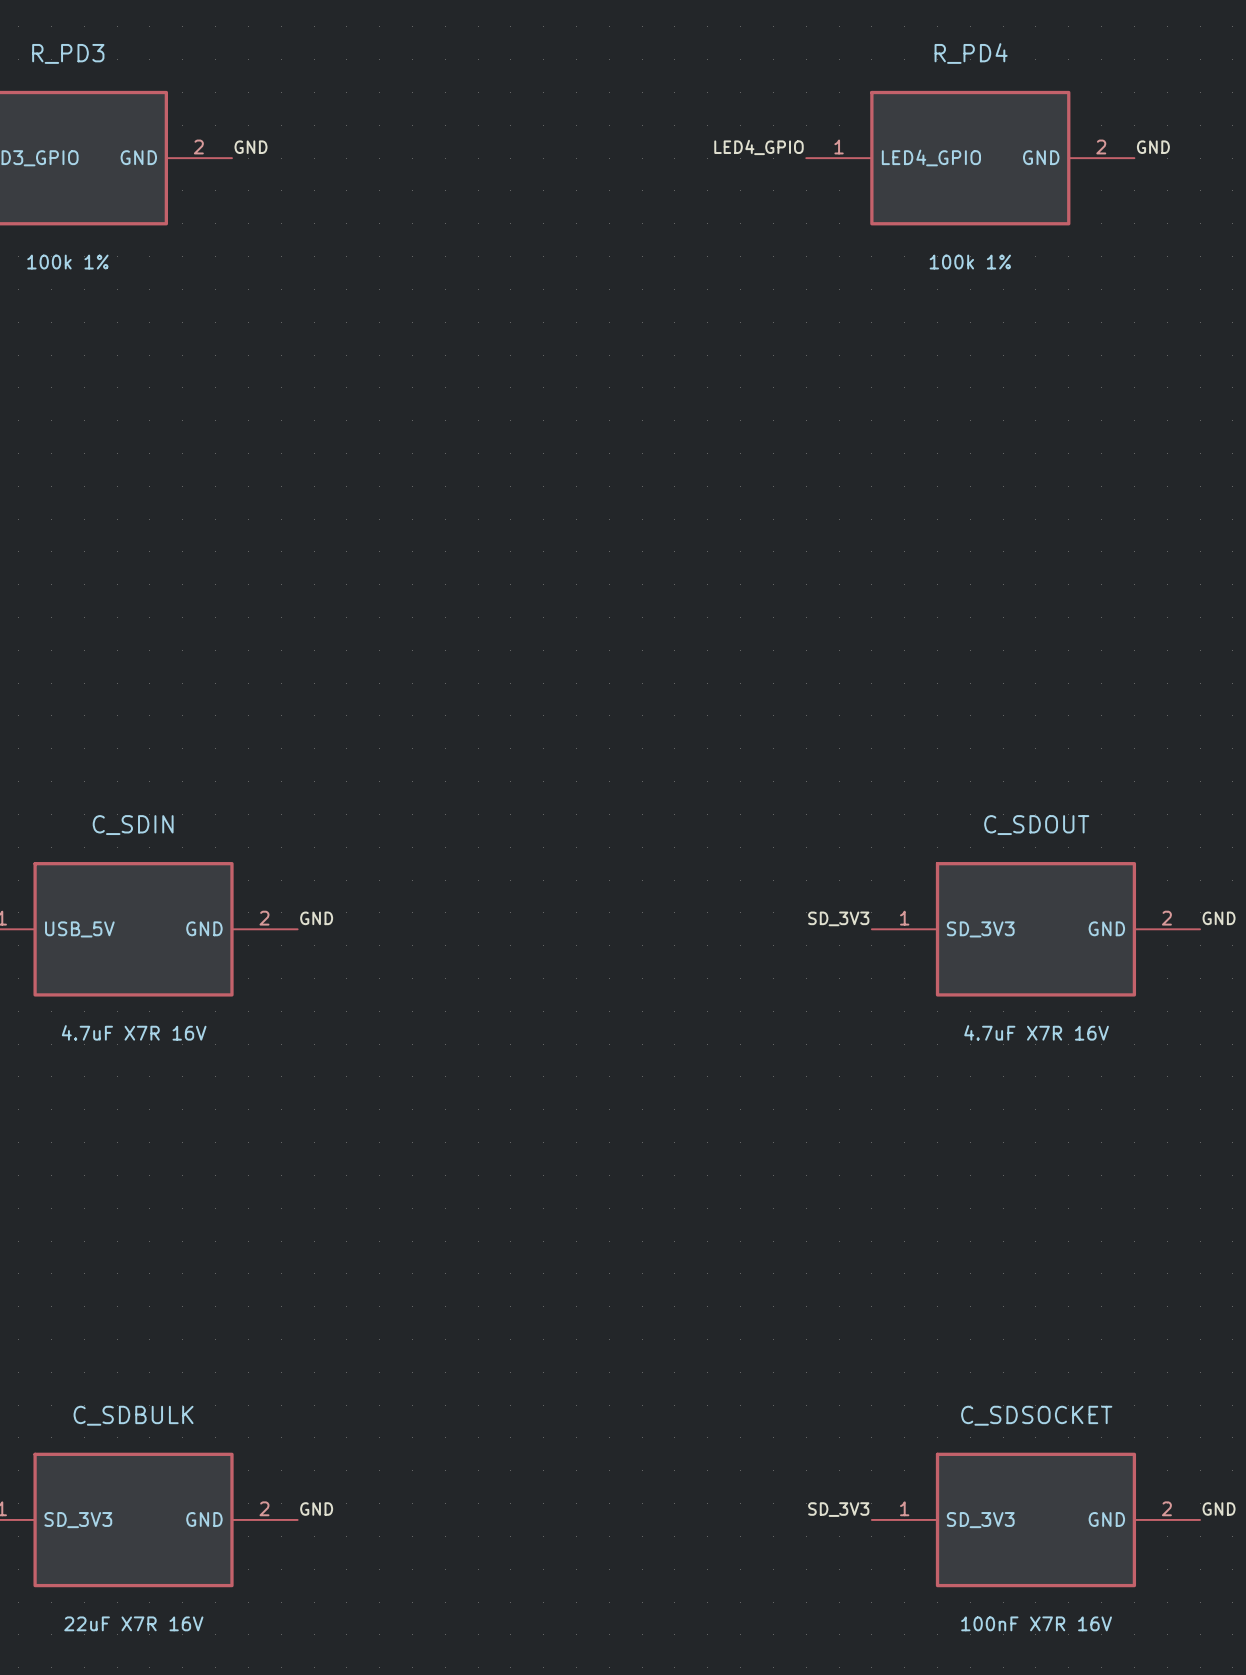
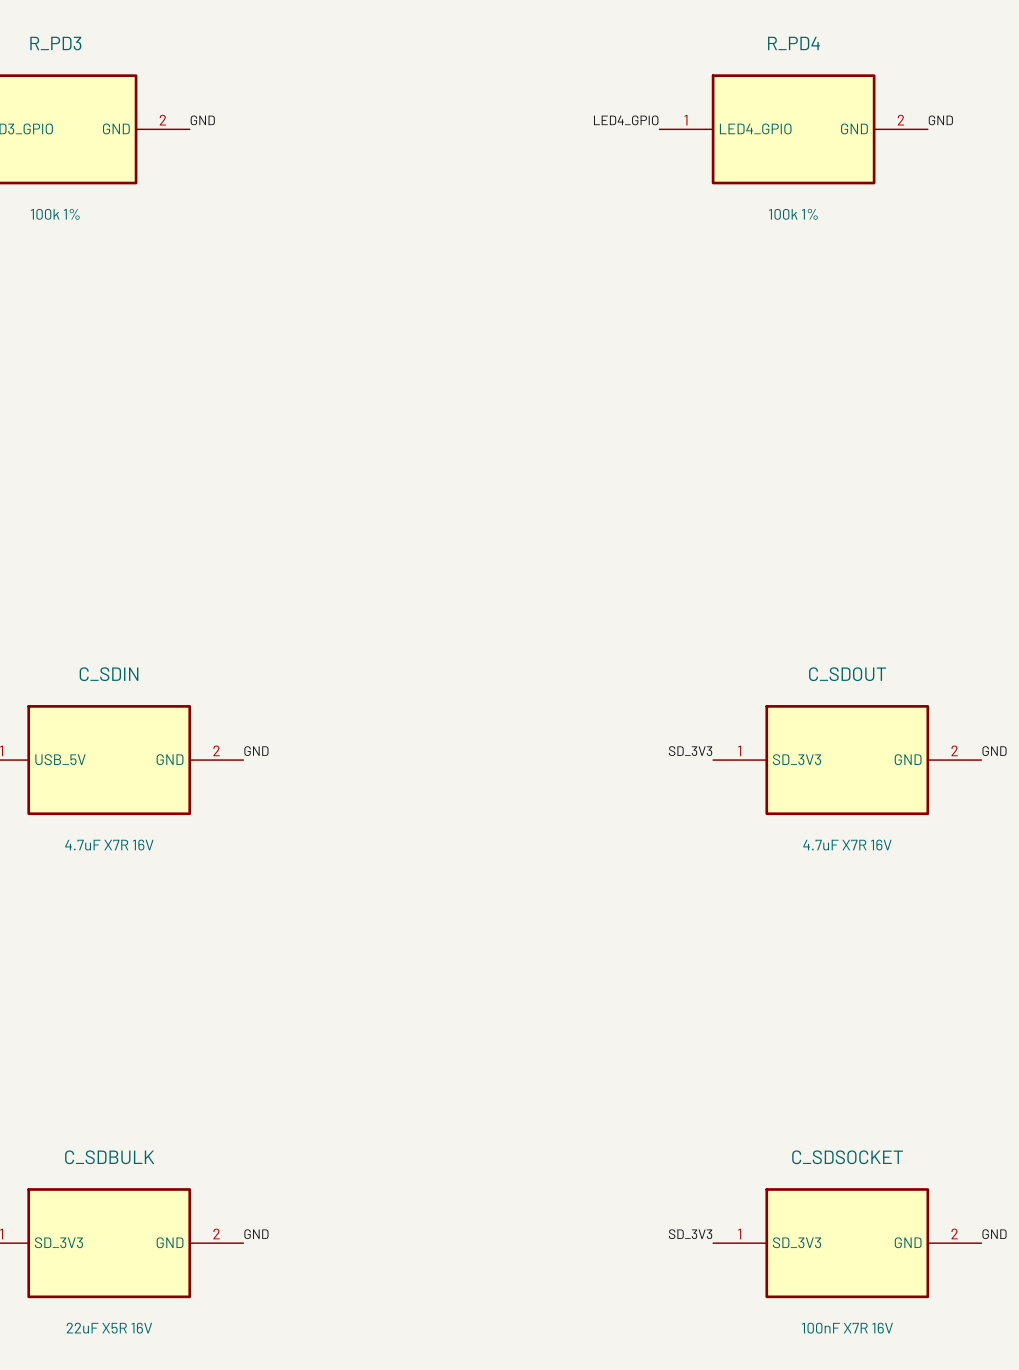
C_SDBULK value: 22uF X7R 16V (133, 1623) -> 22uF X5R 16V (109, 1328)

